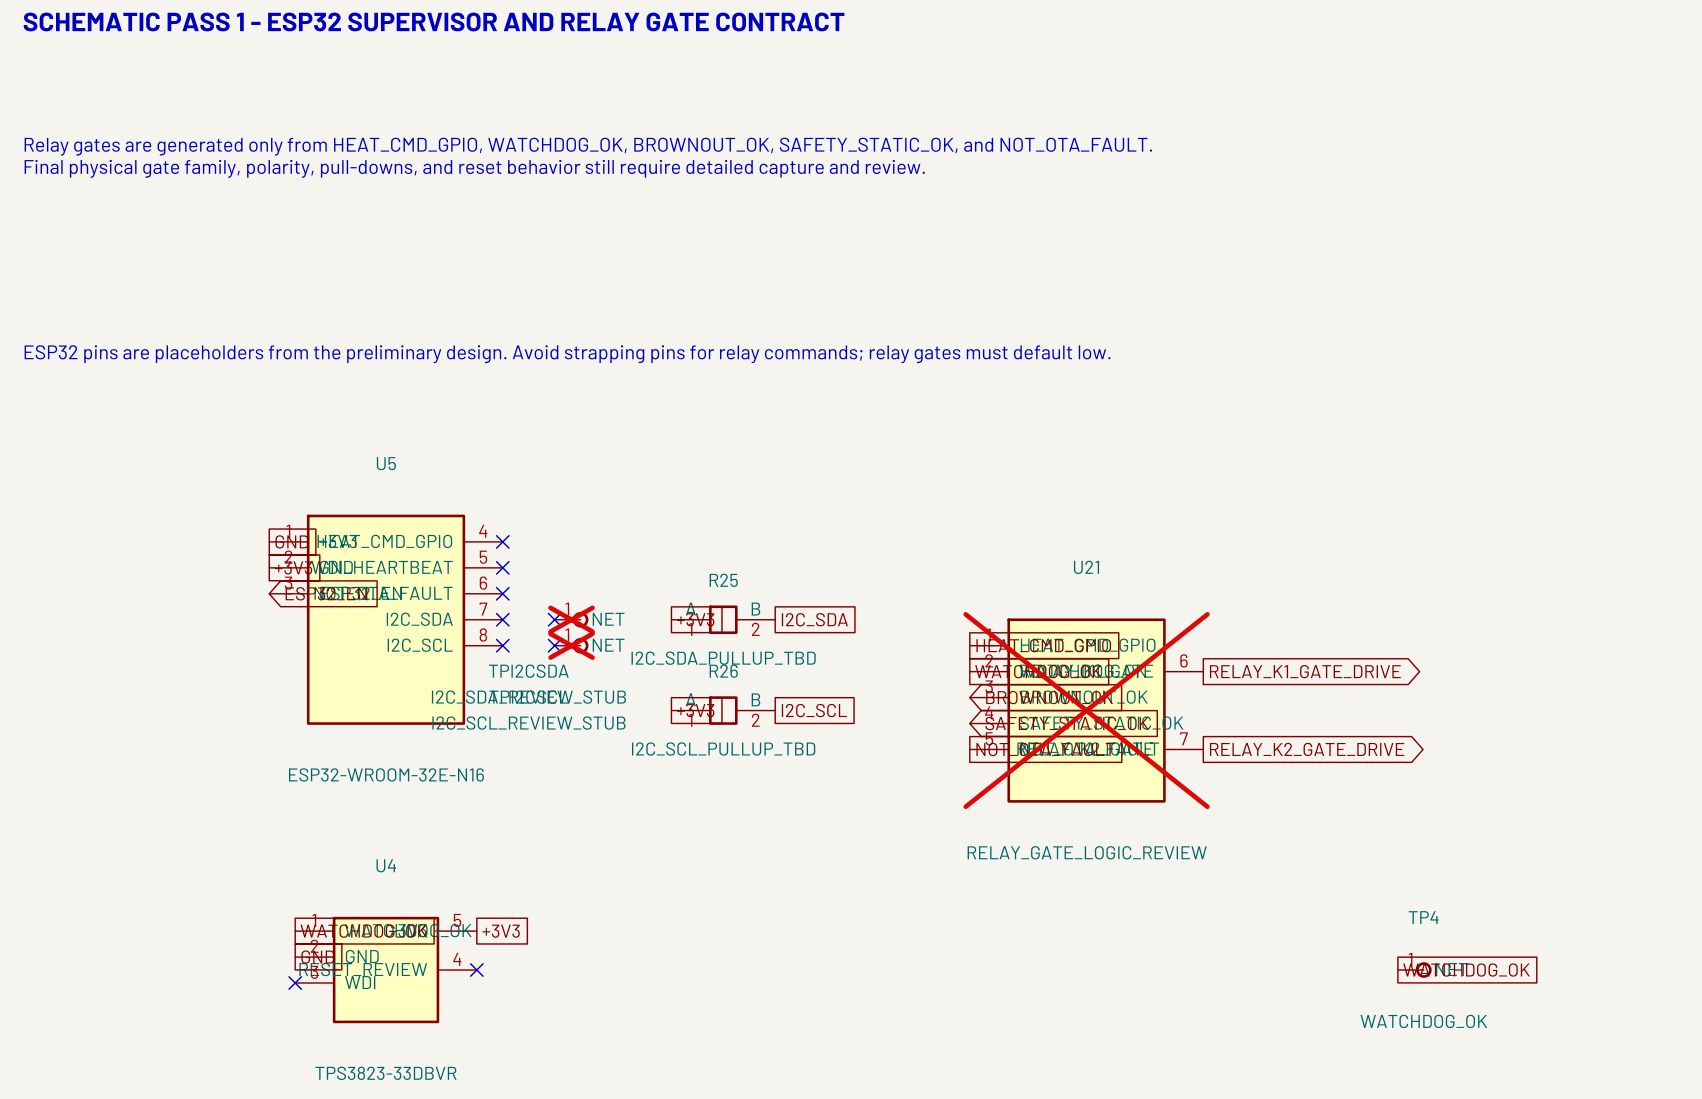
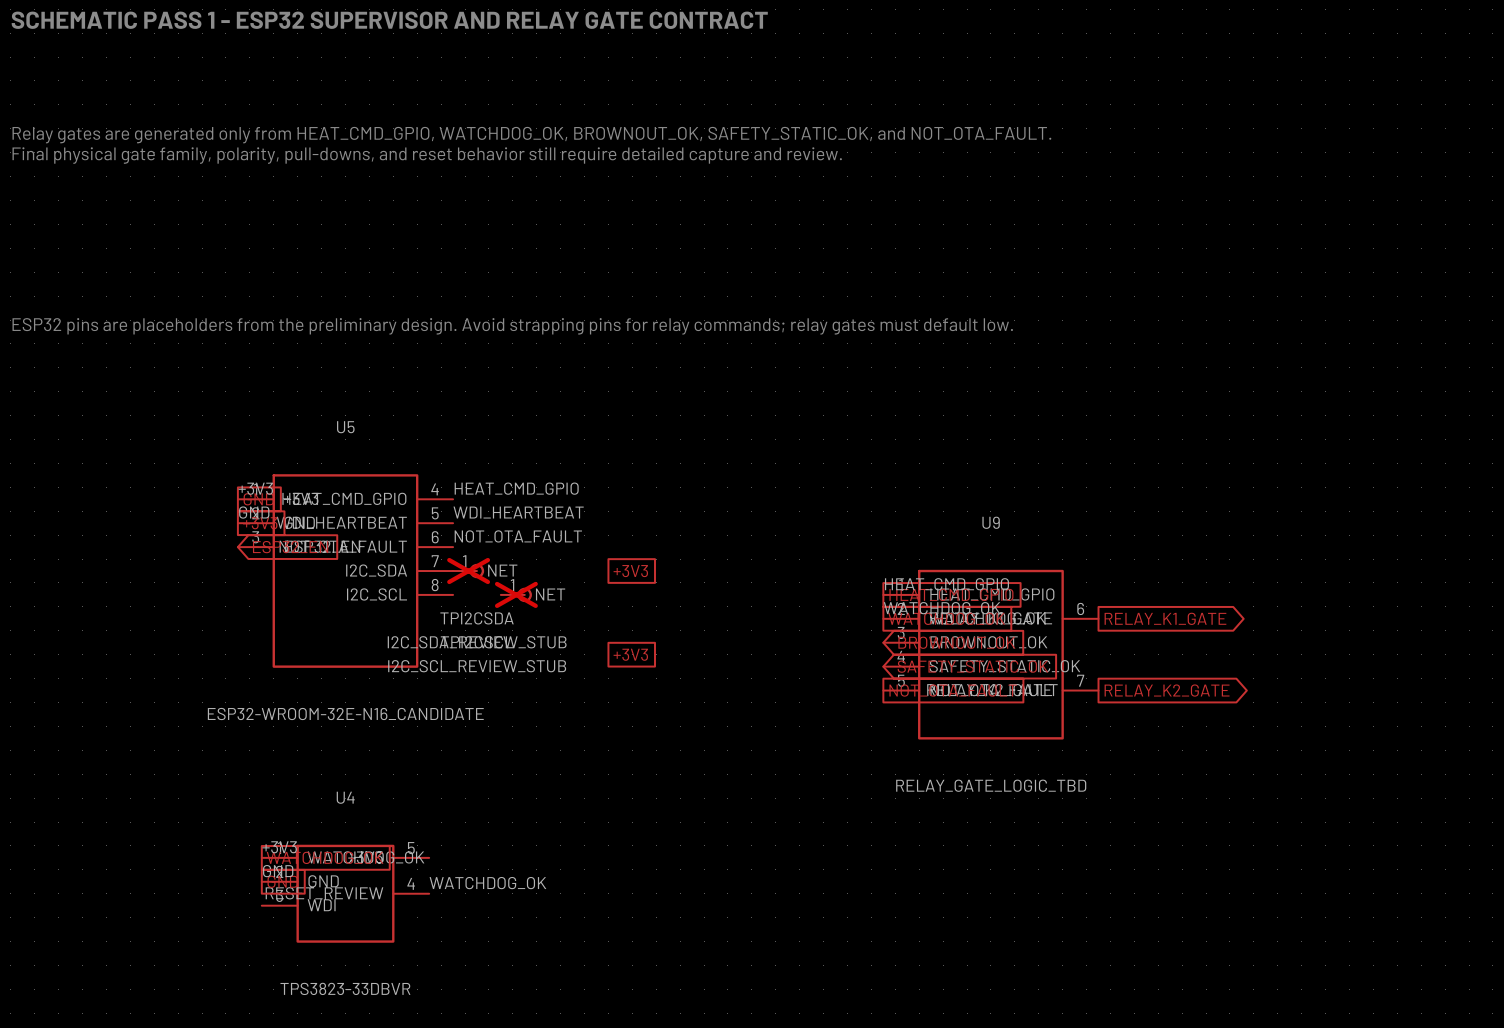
label: none -> +3V3 (255, 488)
label: none -> HEAT_CMD_GPIO (516, 488)
no-connect mark: (502, 541) -> none
label: none -> GND (254, 512)
label: none -> WDI_HEARTBEAT (518, 512)
no-connect mark: (502, 567) -> none
U21 name: U21 (1086, 567) -> U9 (991, 522)
label: none -> NOT_OTA_FAULT (518, 536)
no-connect mark: (502, 593) -> none
no-connect mark: (502, 619) -> none
no-connect mark: (554, 619) -> none
TPI2CSDA position: (571, 619) -> (468, 571)
R25: I2C_SDA_PULLUP_TBD (723, 619) -> none
global label: I2C_SDA (814, 619) -> none
label: none -> HEAT_CMD_GPIO (946, 584)
no-connect mark: (502, 645) -> none
no-connect mark: (554, 645) -> none
label: none -> WATCHDOG_OK (942, 608)
global label: RELAY_K1_GATE_DRIVE (1305, 671) -> RELAY_K1_GATE (1165, 618)
R26: I2C_SCL_PULLUP_TBD (723, 710) -> none
global label: I2C_SCL (814, 710) -> none
U21 do-not-place cross: (1086, 710) -> none
global label: RELAY_K2_GATE_DRIVE (1307, 749) -> RELAY_K2_GATE (1167, 690)
U5 value: ESP32-WROOM-32E-N16 (386, 774) -> ESP32-WROOM-32E-N16_CANDIDATE (345, 714)
U21 value: RELAY_GATE_LOGIC_REVIEW (1087, 852) -> RELAY_GATE_LOGIC_TBD (991, 785)
label: none -> +3V3 (279, 847)
global label: +3V3 (501, 931) -> none
label: none -> GND (278, 871)
label: none -> WATCHDOG_OK (487, 883)
no-connect mark: (476, 970) -> none
TP4: WATCHDOG_OK (1414, 970) -> none
global label: WATCHDOG_OK (1466, 970) -> none
no-connect mark: (295, 982) -> none

